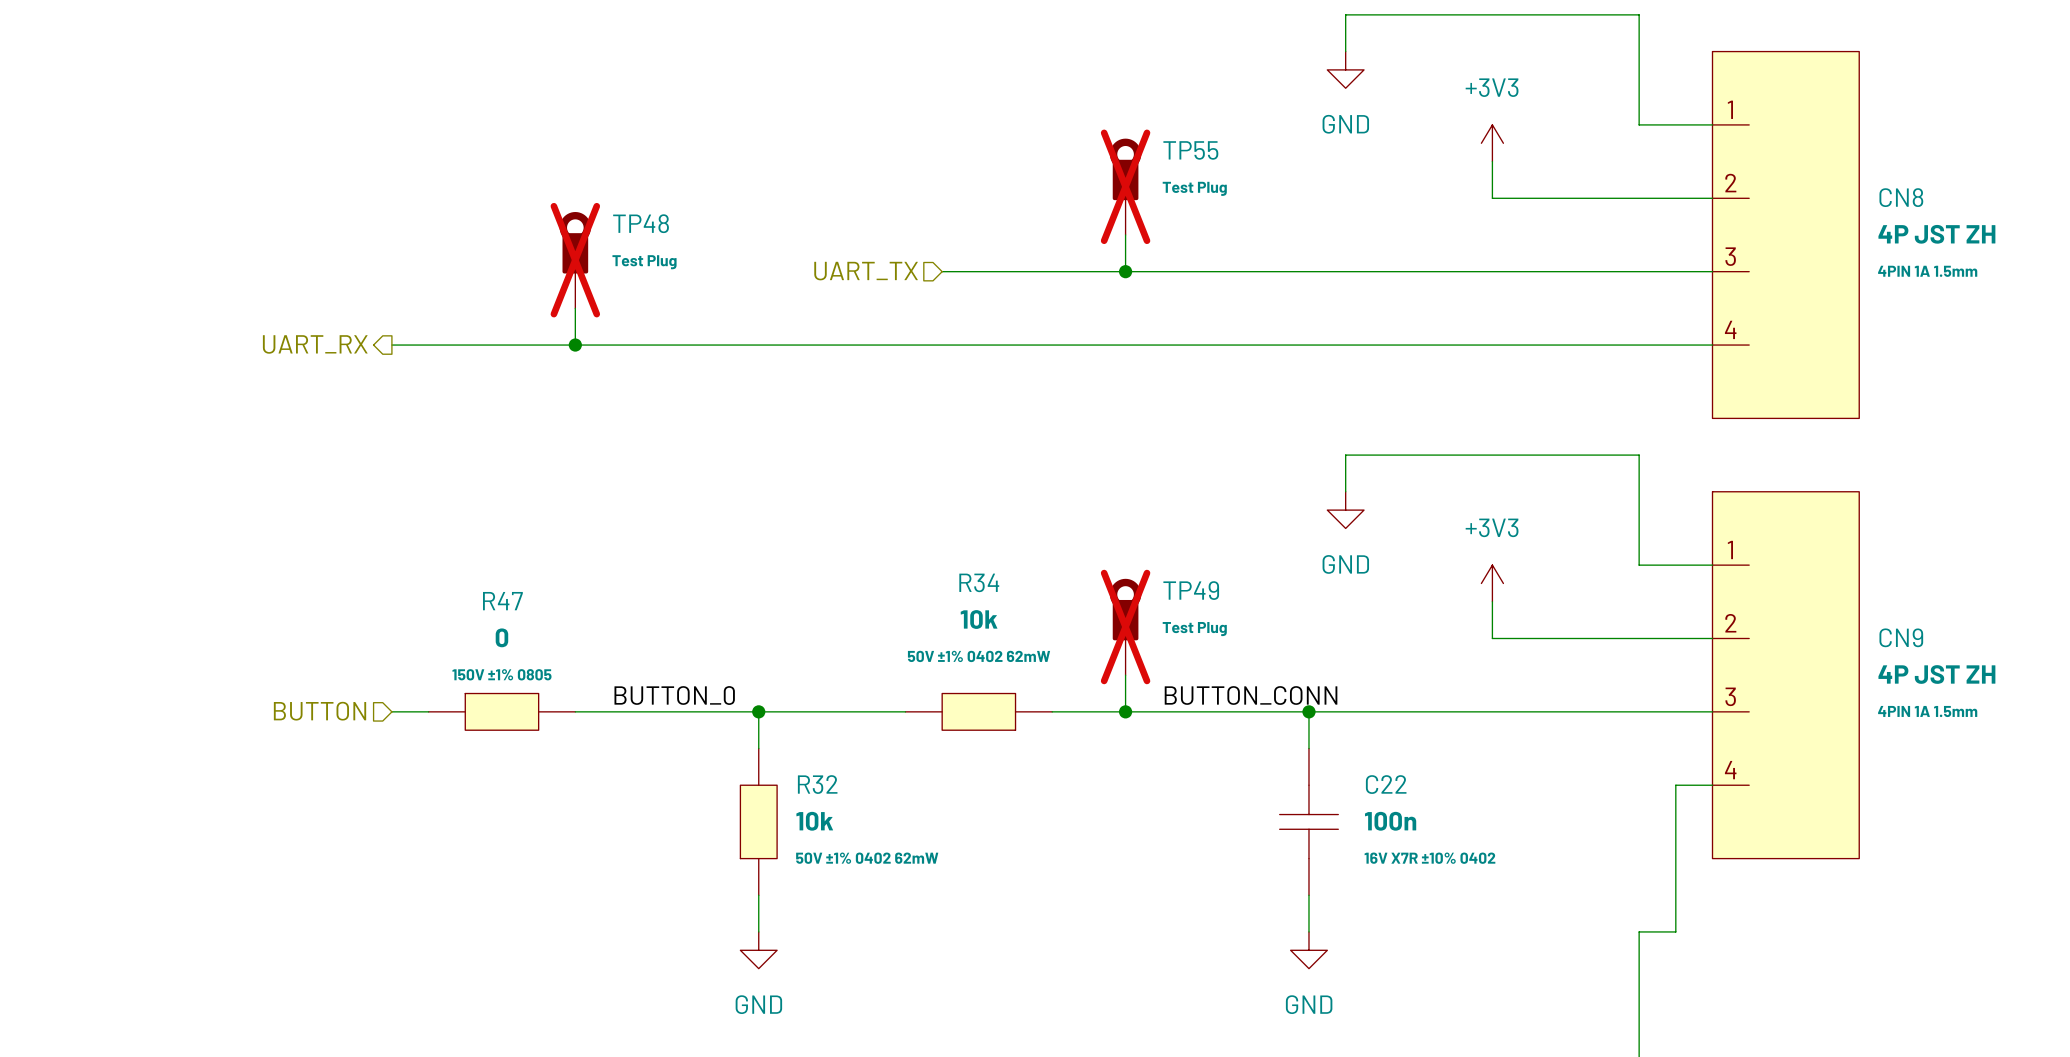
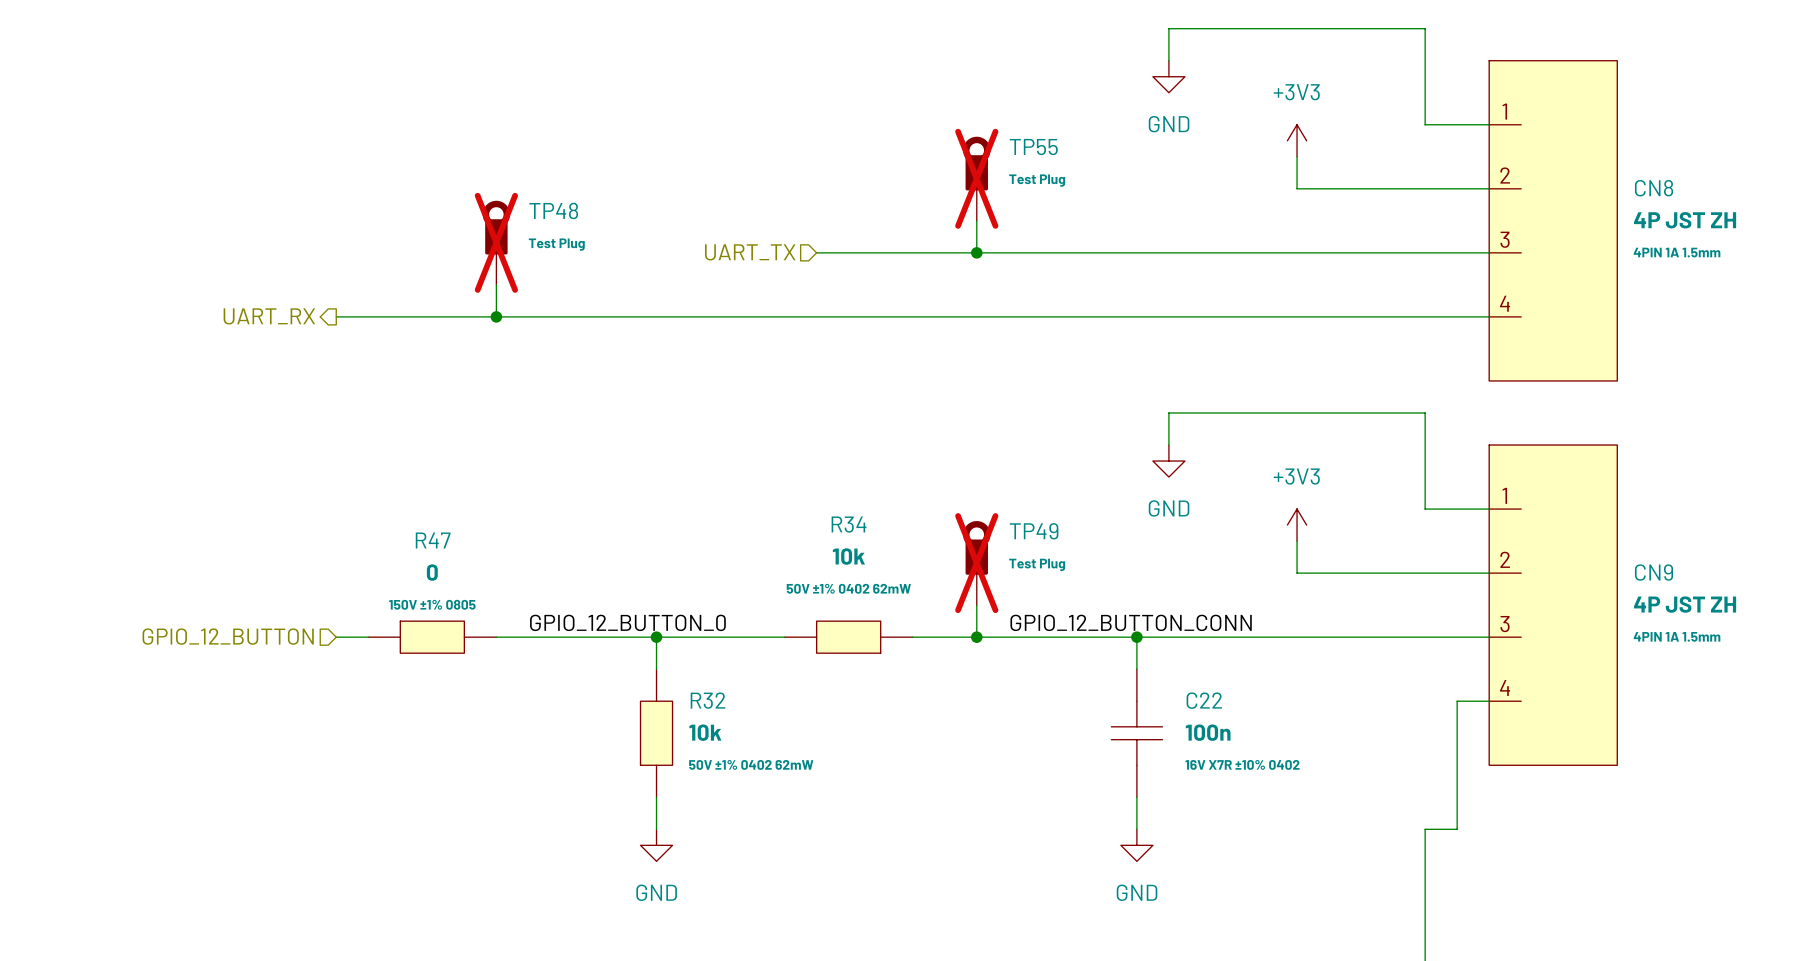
label: BUTTON_0 (674, 695) -> GPIO_12_BUTTON_0 (627, 622)
label: BUTTON_CONN (1251, 695) -> GPIO_12_BUTTON_CONN (1131, 622)
hierarchical label: BUTTON (320, 711) -> GPIO_12_BUTTON (228, 636)

